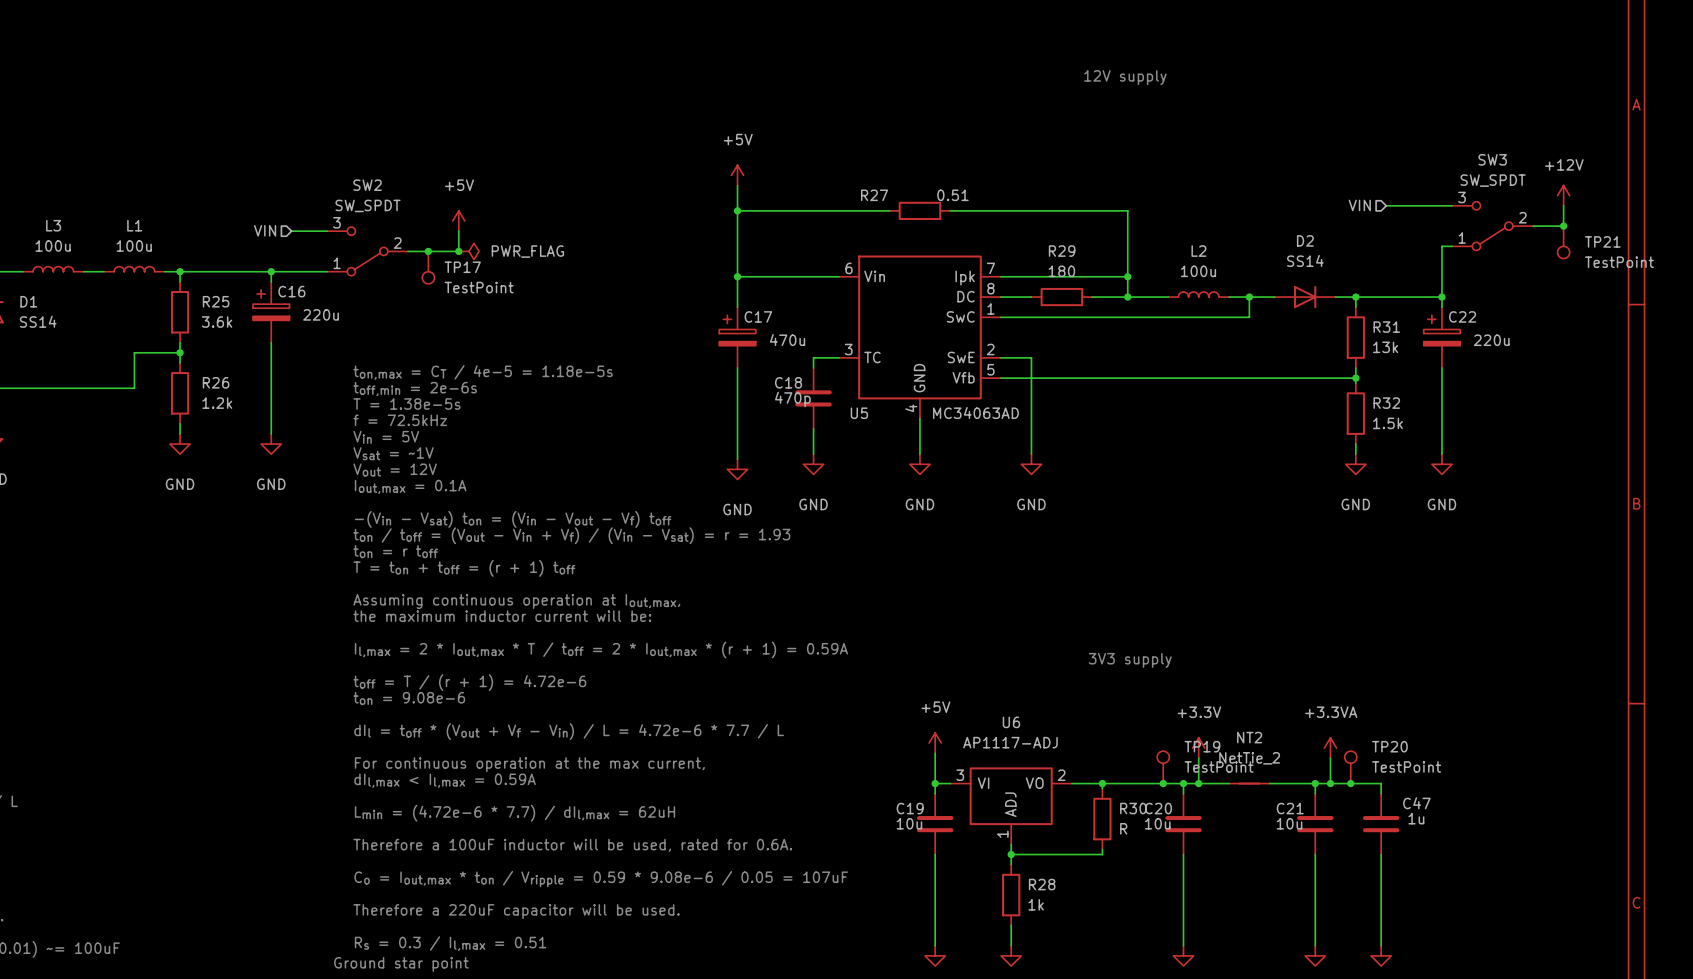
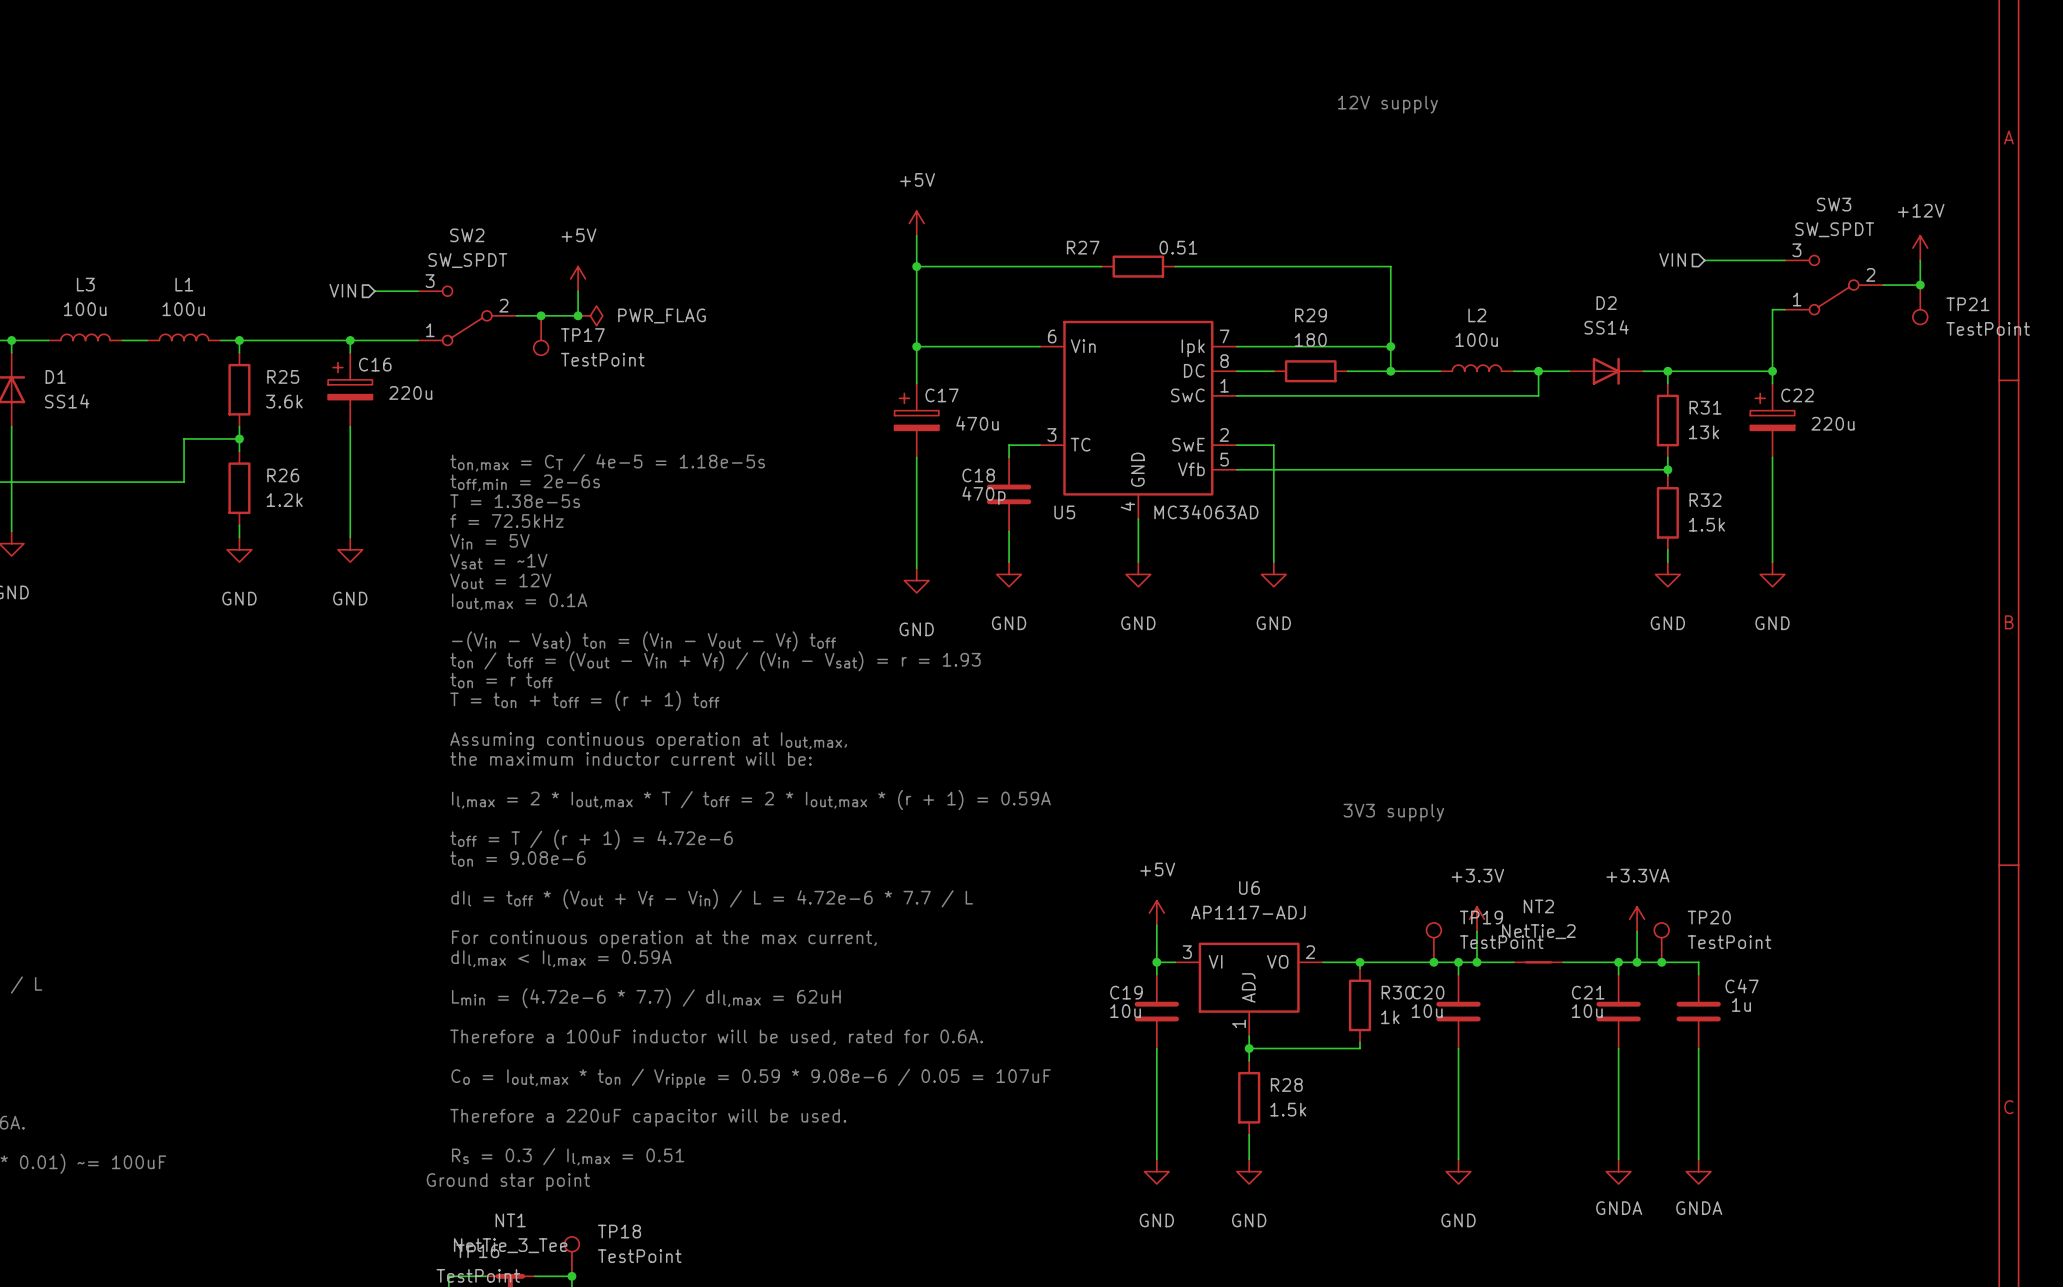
R30 value: R (1123, 828) -> 1k (1390, 1017)
R28 value: 1k (1036, 904) -> 1.5k (1288, 1109)

